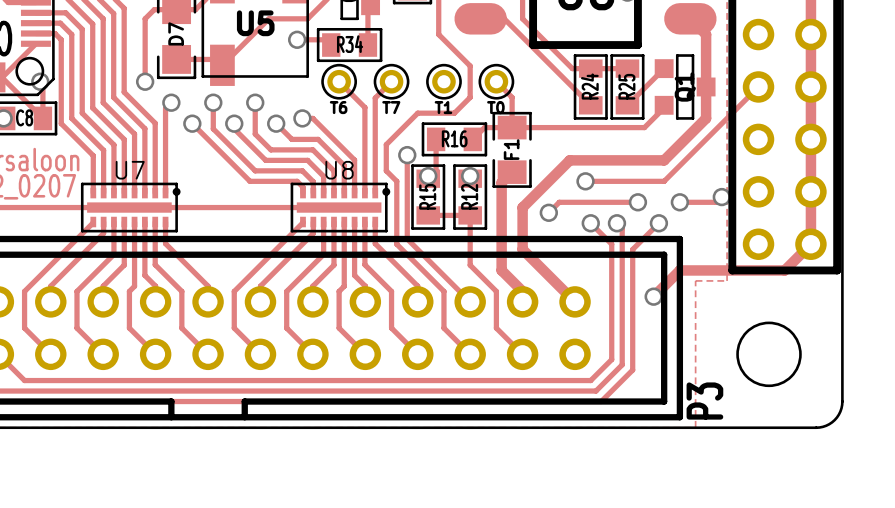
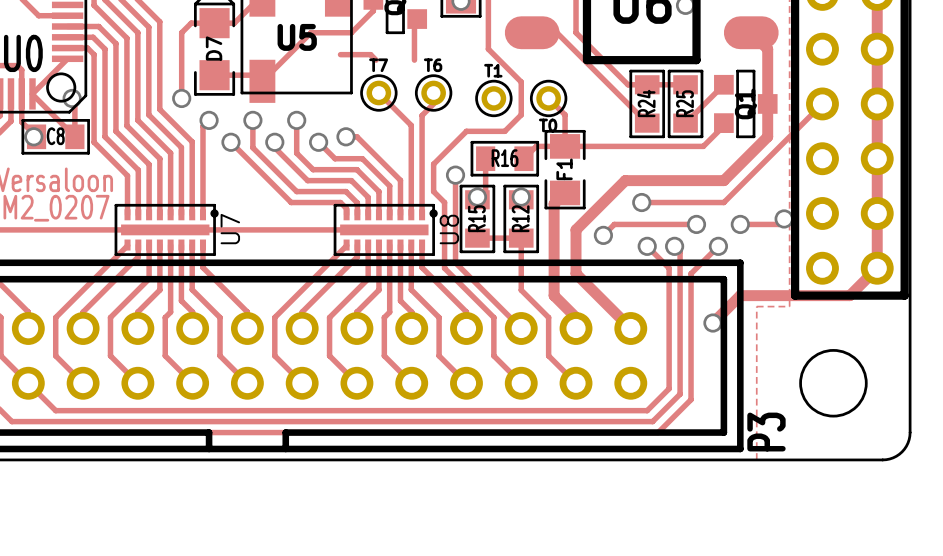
via: (297, 39) -> none
R34: (349, 45) -> none
T6 position: (339, 81) -> (433, 92)
T7 position: (391, 81) -> (378, 92)
T6 name position: T6 (338, 107) -> T6 (433, 65)
T7 name position: T7 (391, 107) -> T7 (378, 65)
T1 name position: T1 (443, 107) -> T1 (493, 70)
U7 name rotation: 0° (130, 170) -> 90° counterclockwise (230, 229)
U7 name position: U7 (130, 170) -> U7 (230, 229)
U8 name rotation: 0° (339, 170) -> 90° counterclockwise (449, 229)
U8 name position: U8 (339, 170) -> U8 (449, 229)

